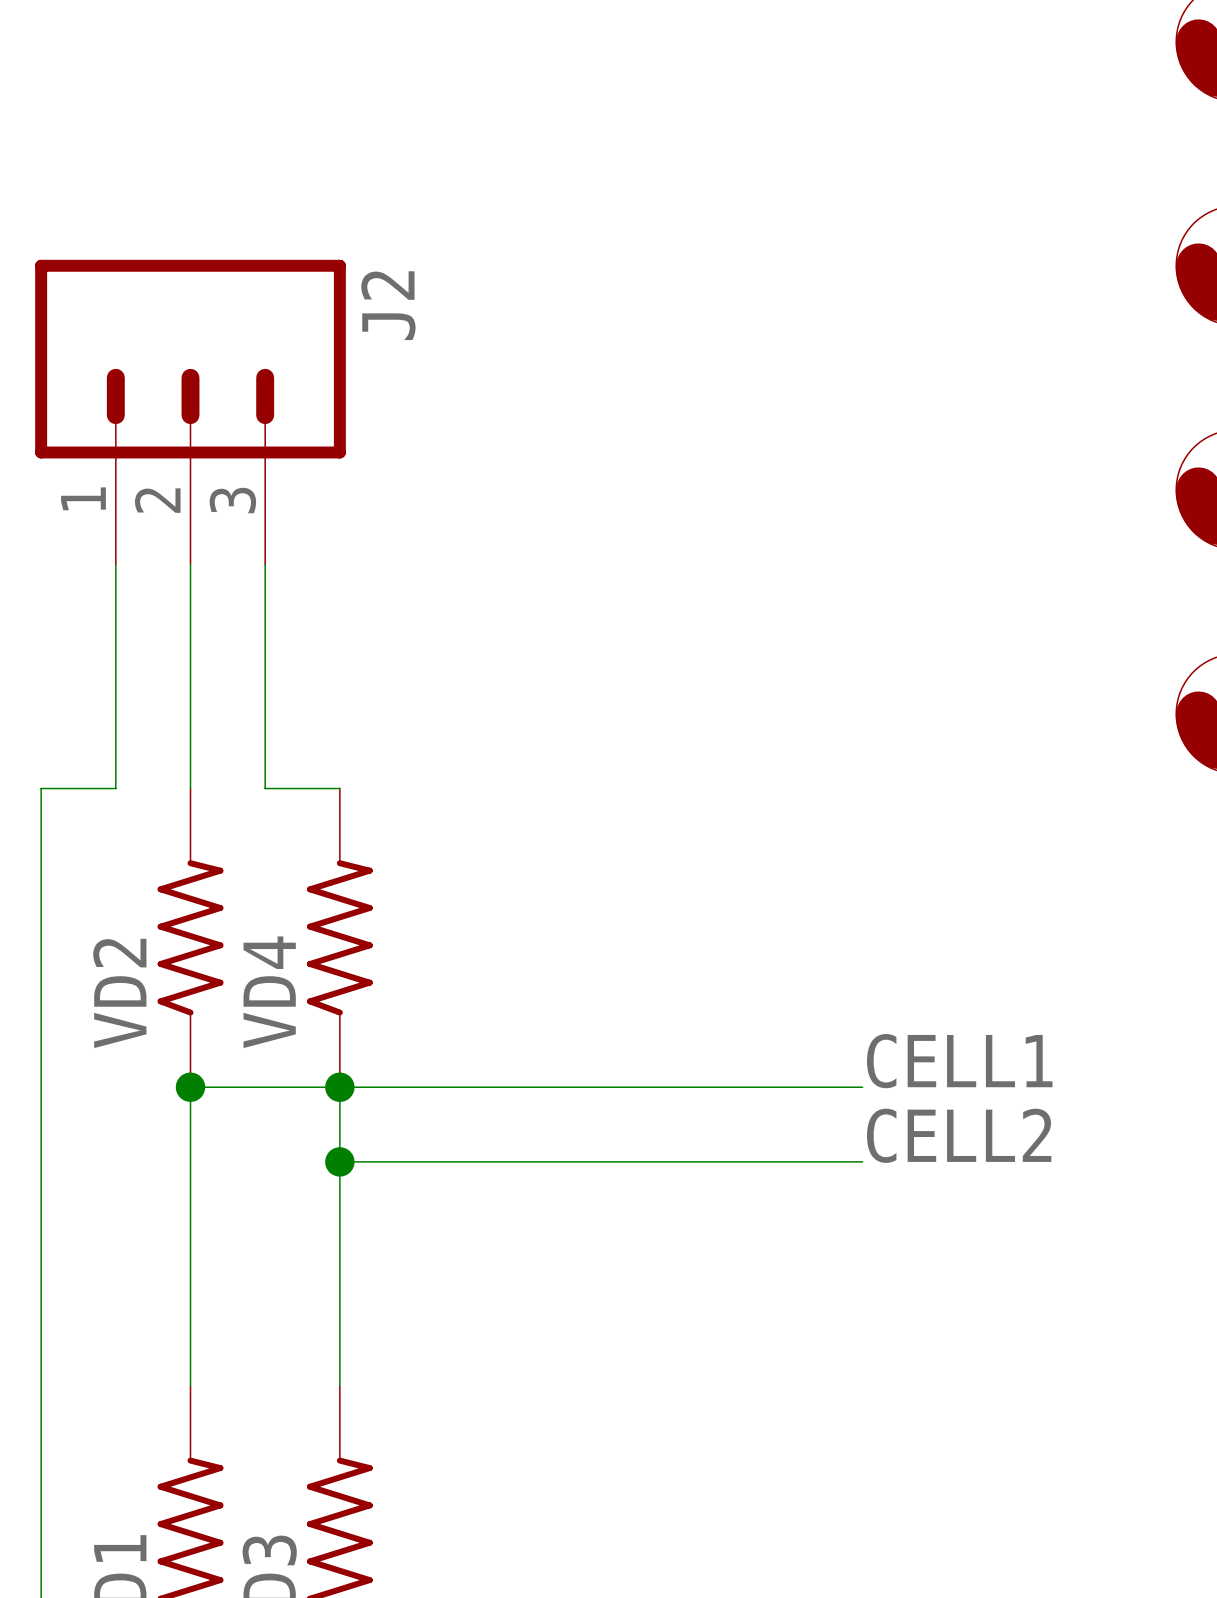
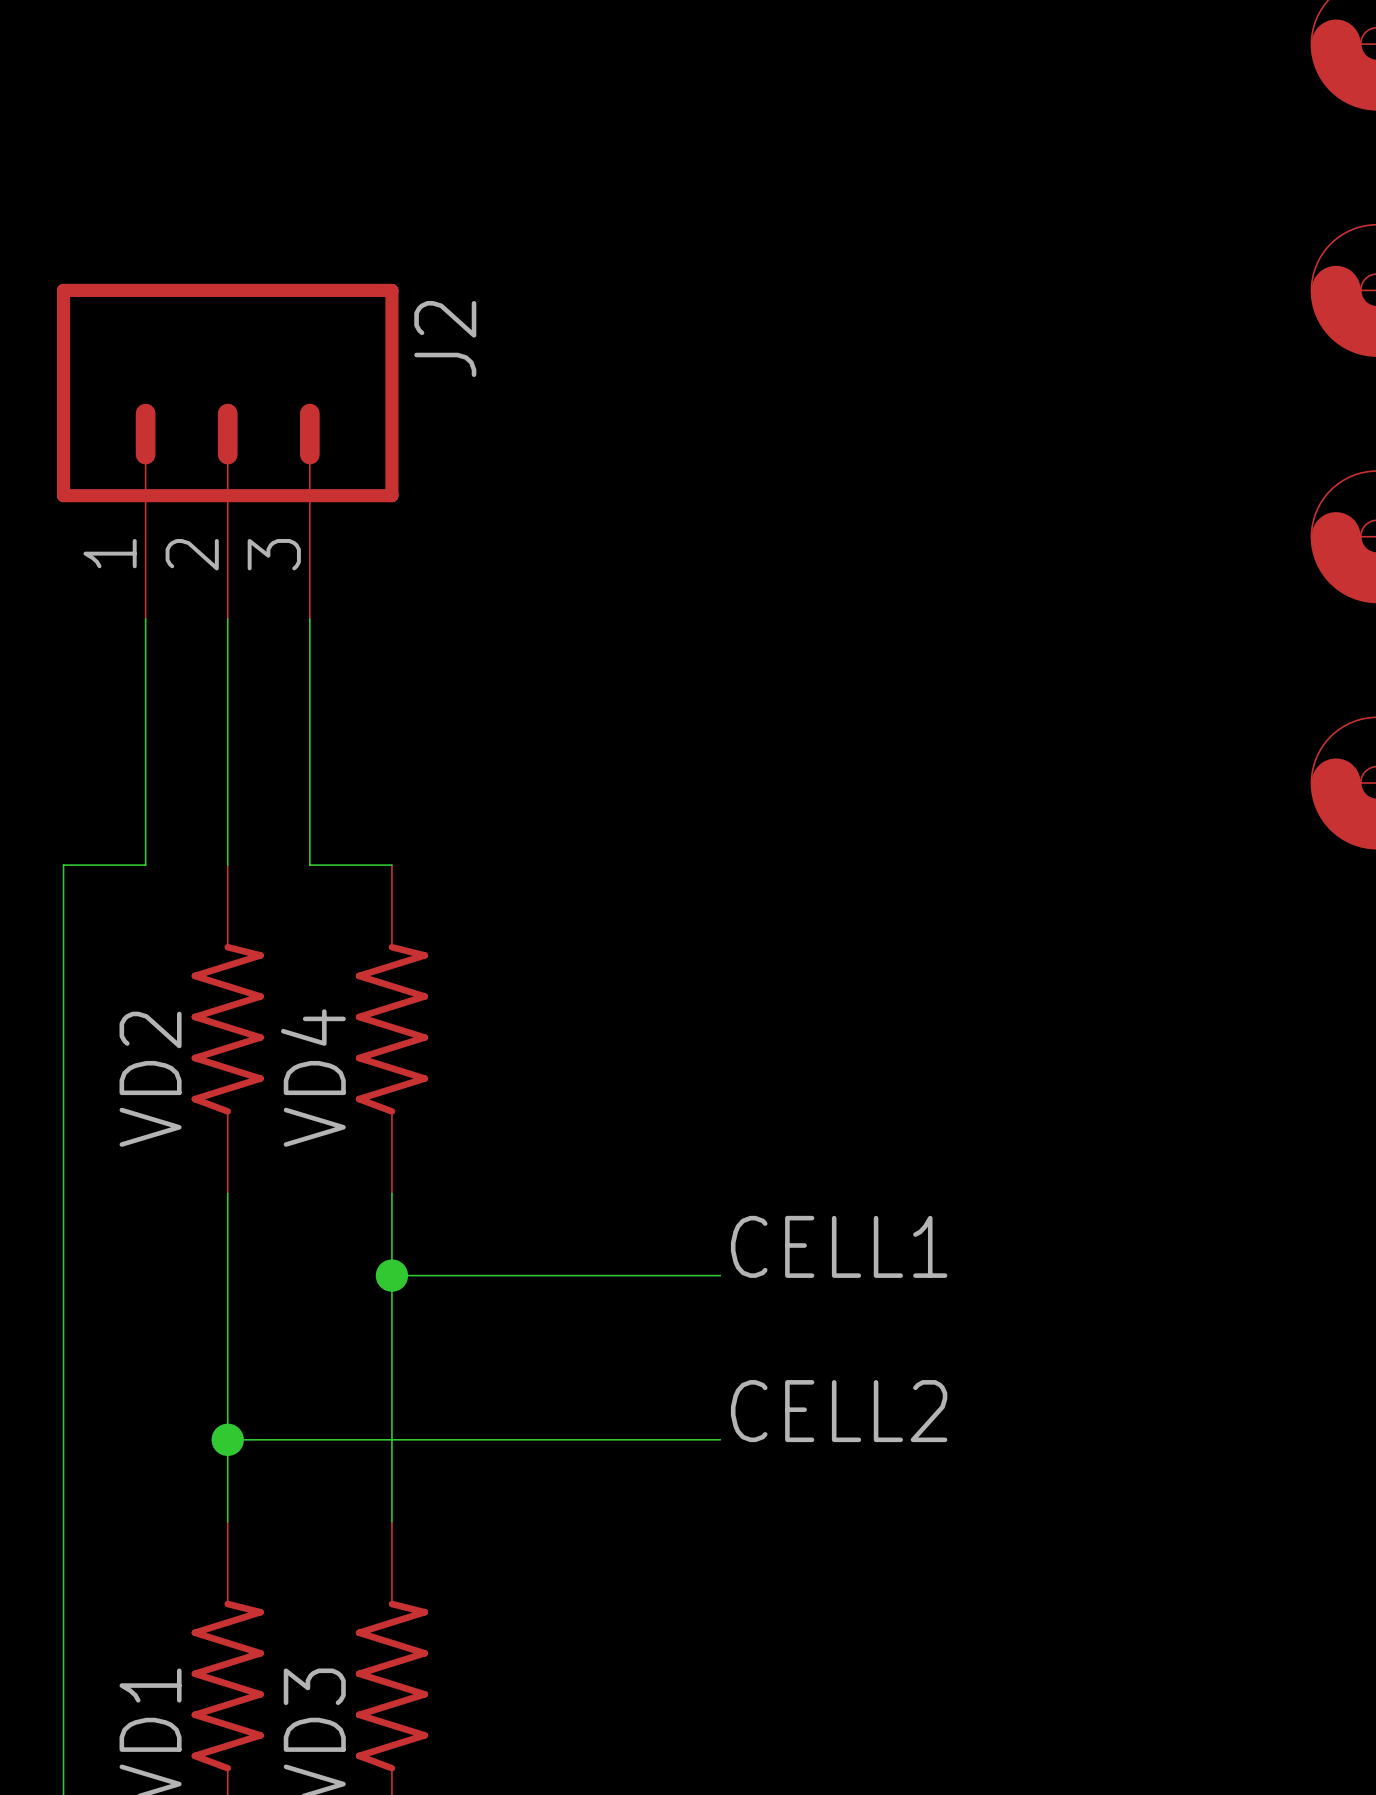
label position: CELL1 (959, 1061) -> CELL1 (839, 1246)
wire: (190, 1087) (862, 1087) -> none
junction: (190, 1087) -> none
junction: (339, 1087) -> none
label position: CELL2 (959, 1135) -> CELL2 (839, 1411)
wire: (638, 1161) (862, 1161) -> none
wire: none -> (227, 1439) (720, 1439)
junction: none -> (227, 1439)

